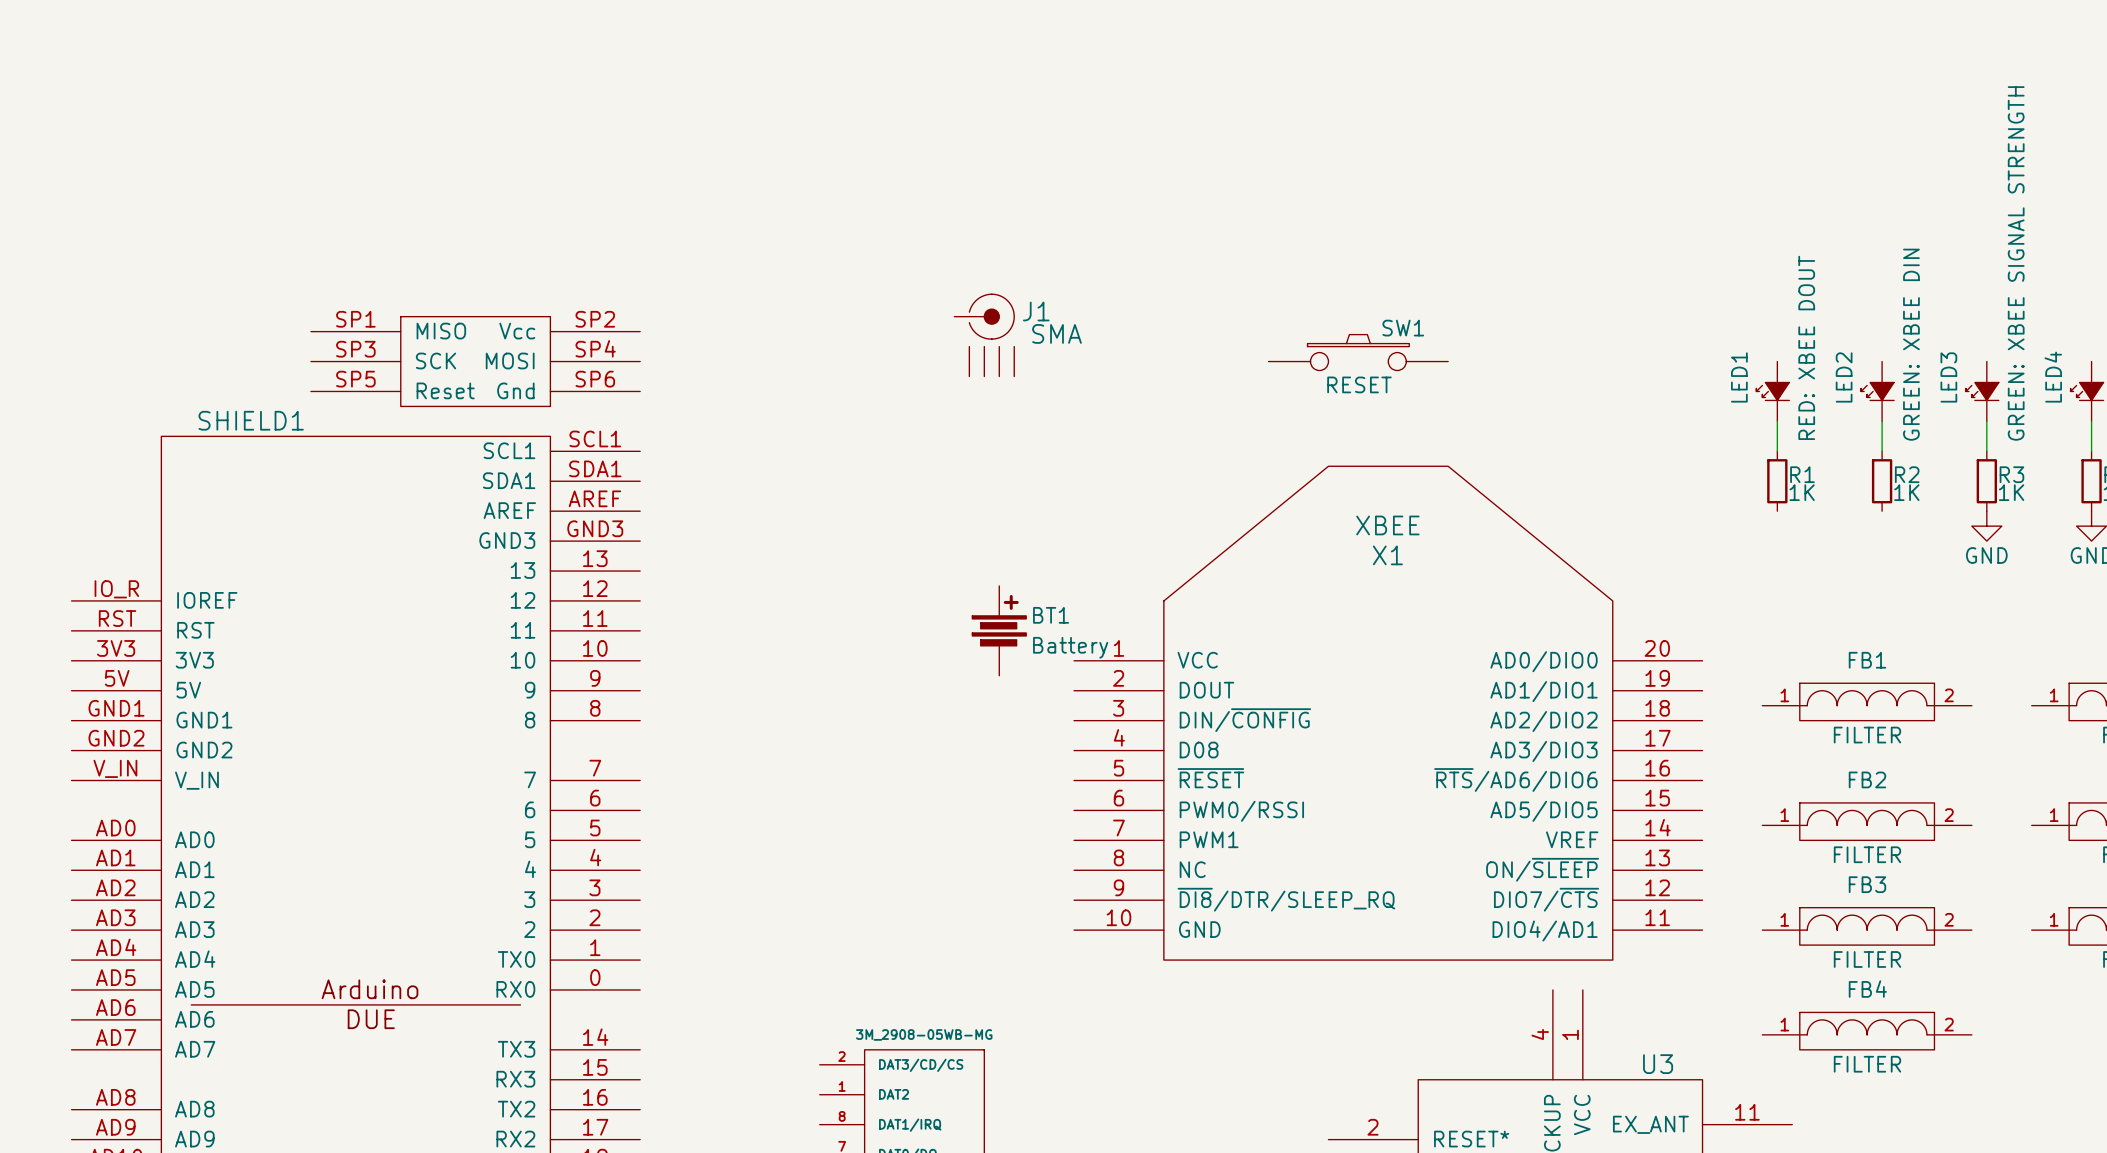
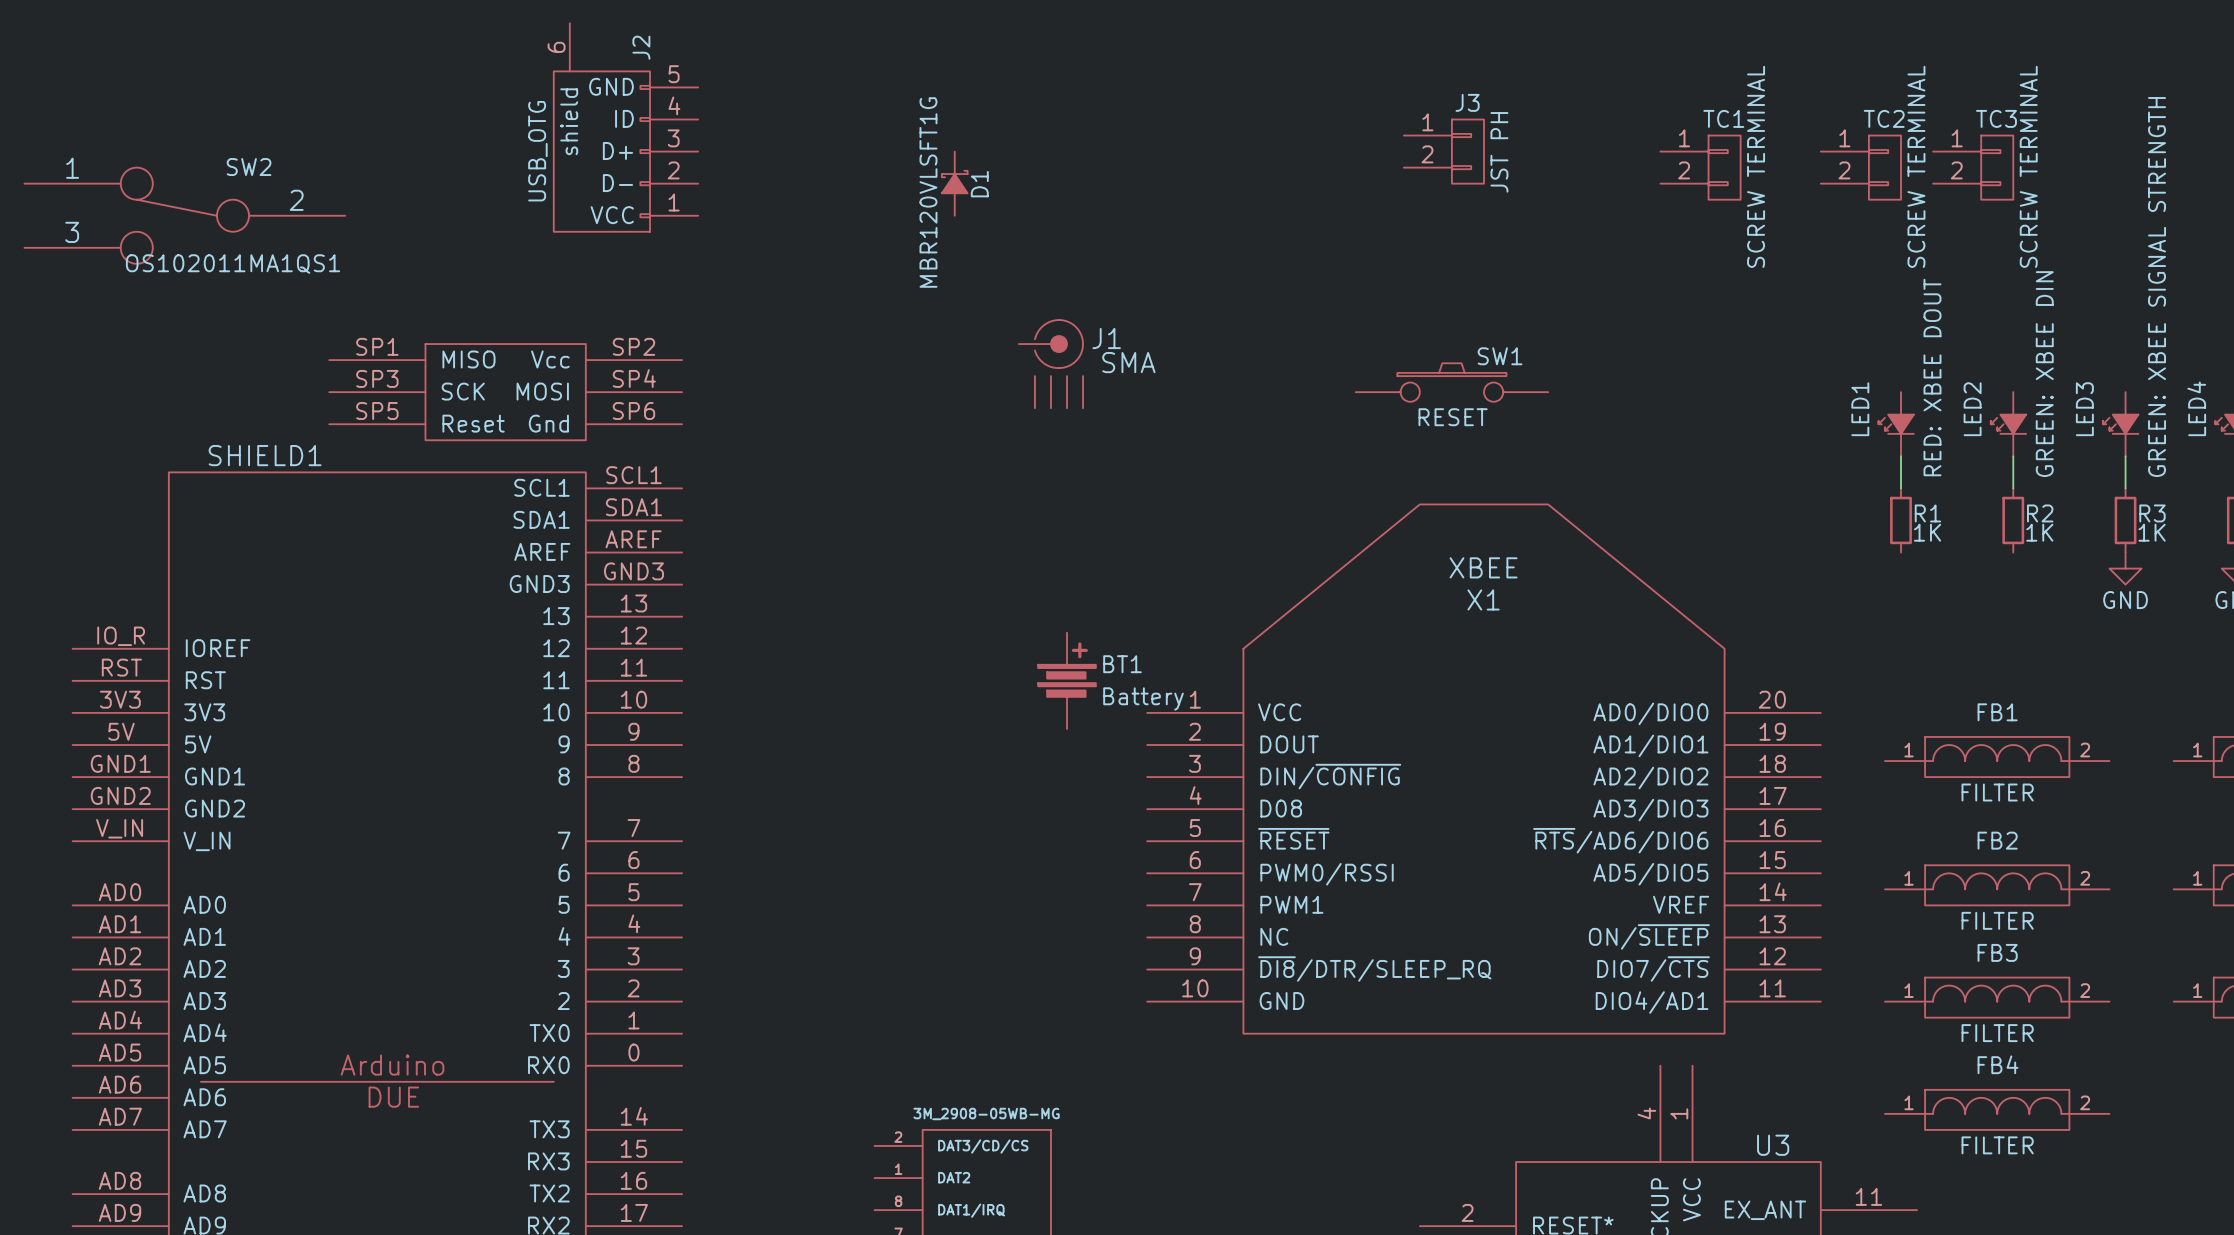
J2: none -> USB_OTG (625, 127)
J3: none -> JST PH (1443, 151)
TC1: none -> SCREW TERMINAL (1700, 167)
TC2: none -> SCREW TERMINAL (1860, 167)
TC3: none -> SCREW TERMINAL (1973, 167)
D1: none -> MBR120VLSFT1G (954, 183)
SW2: none -> OS102011MA1QS1 (184, 215)

